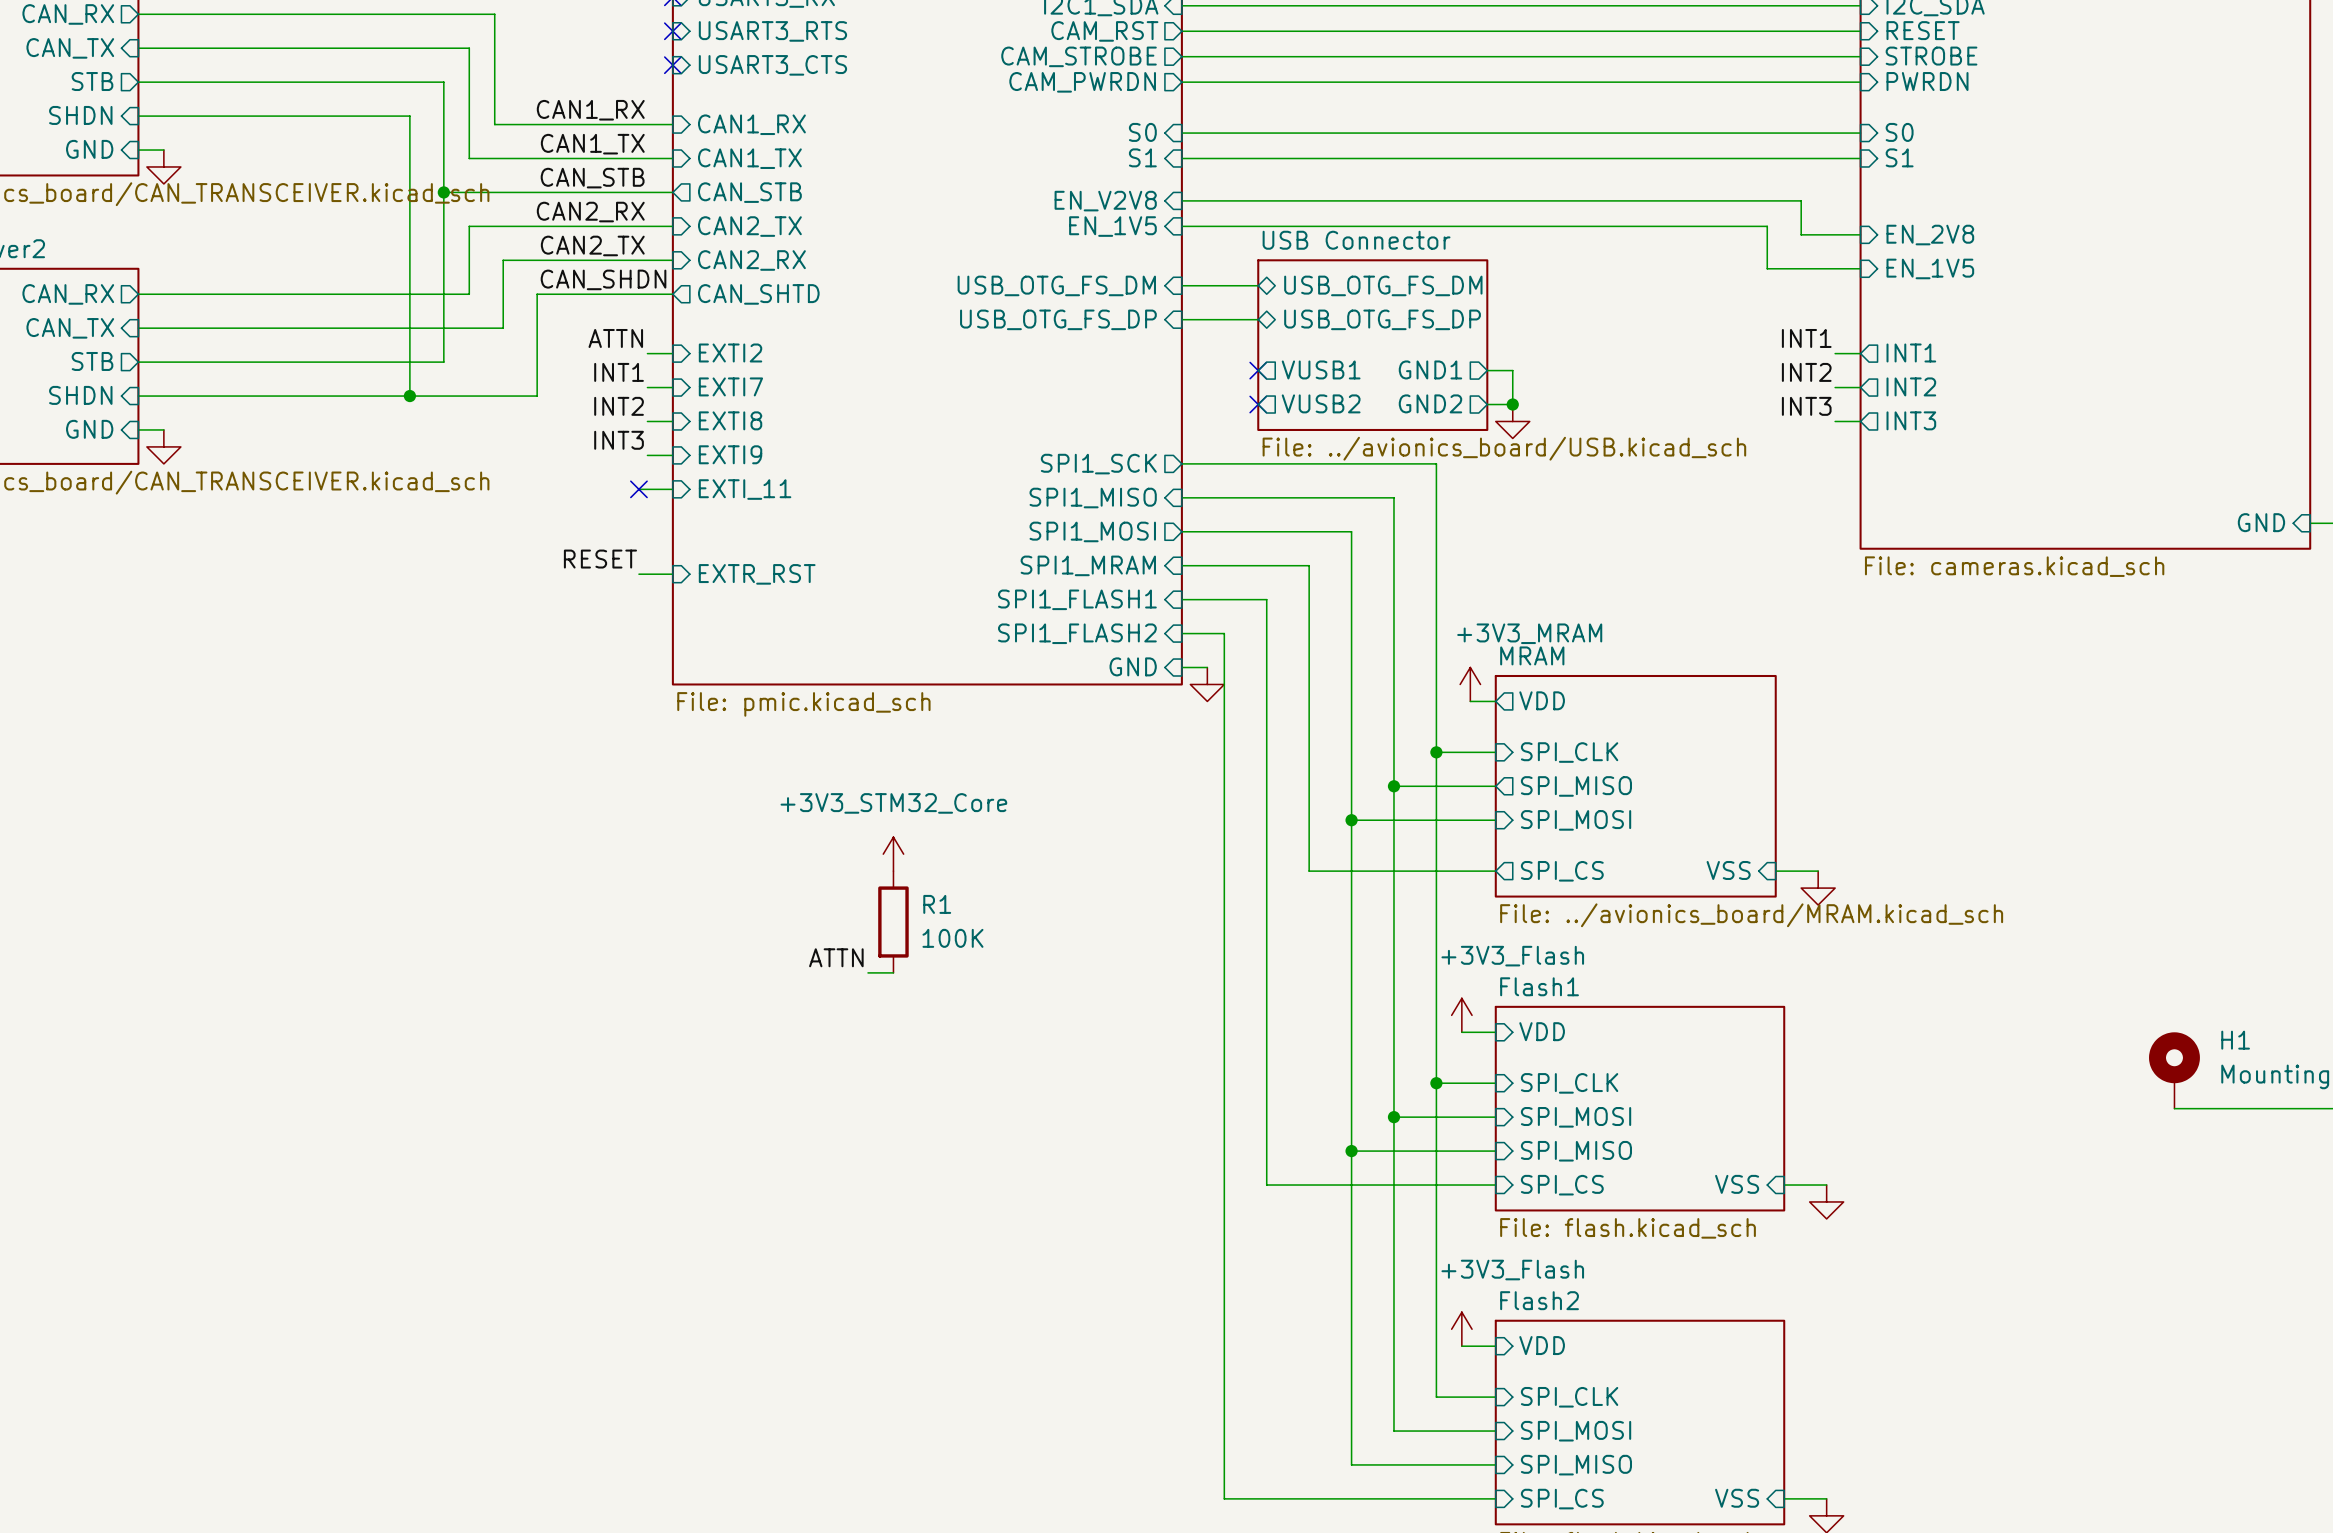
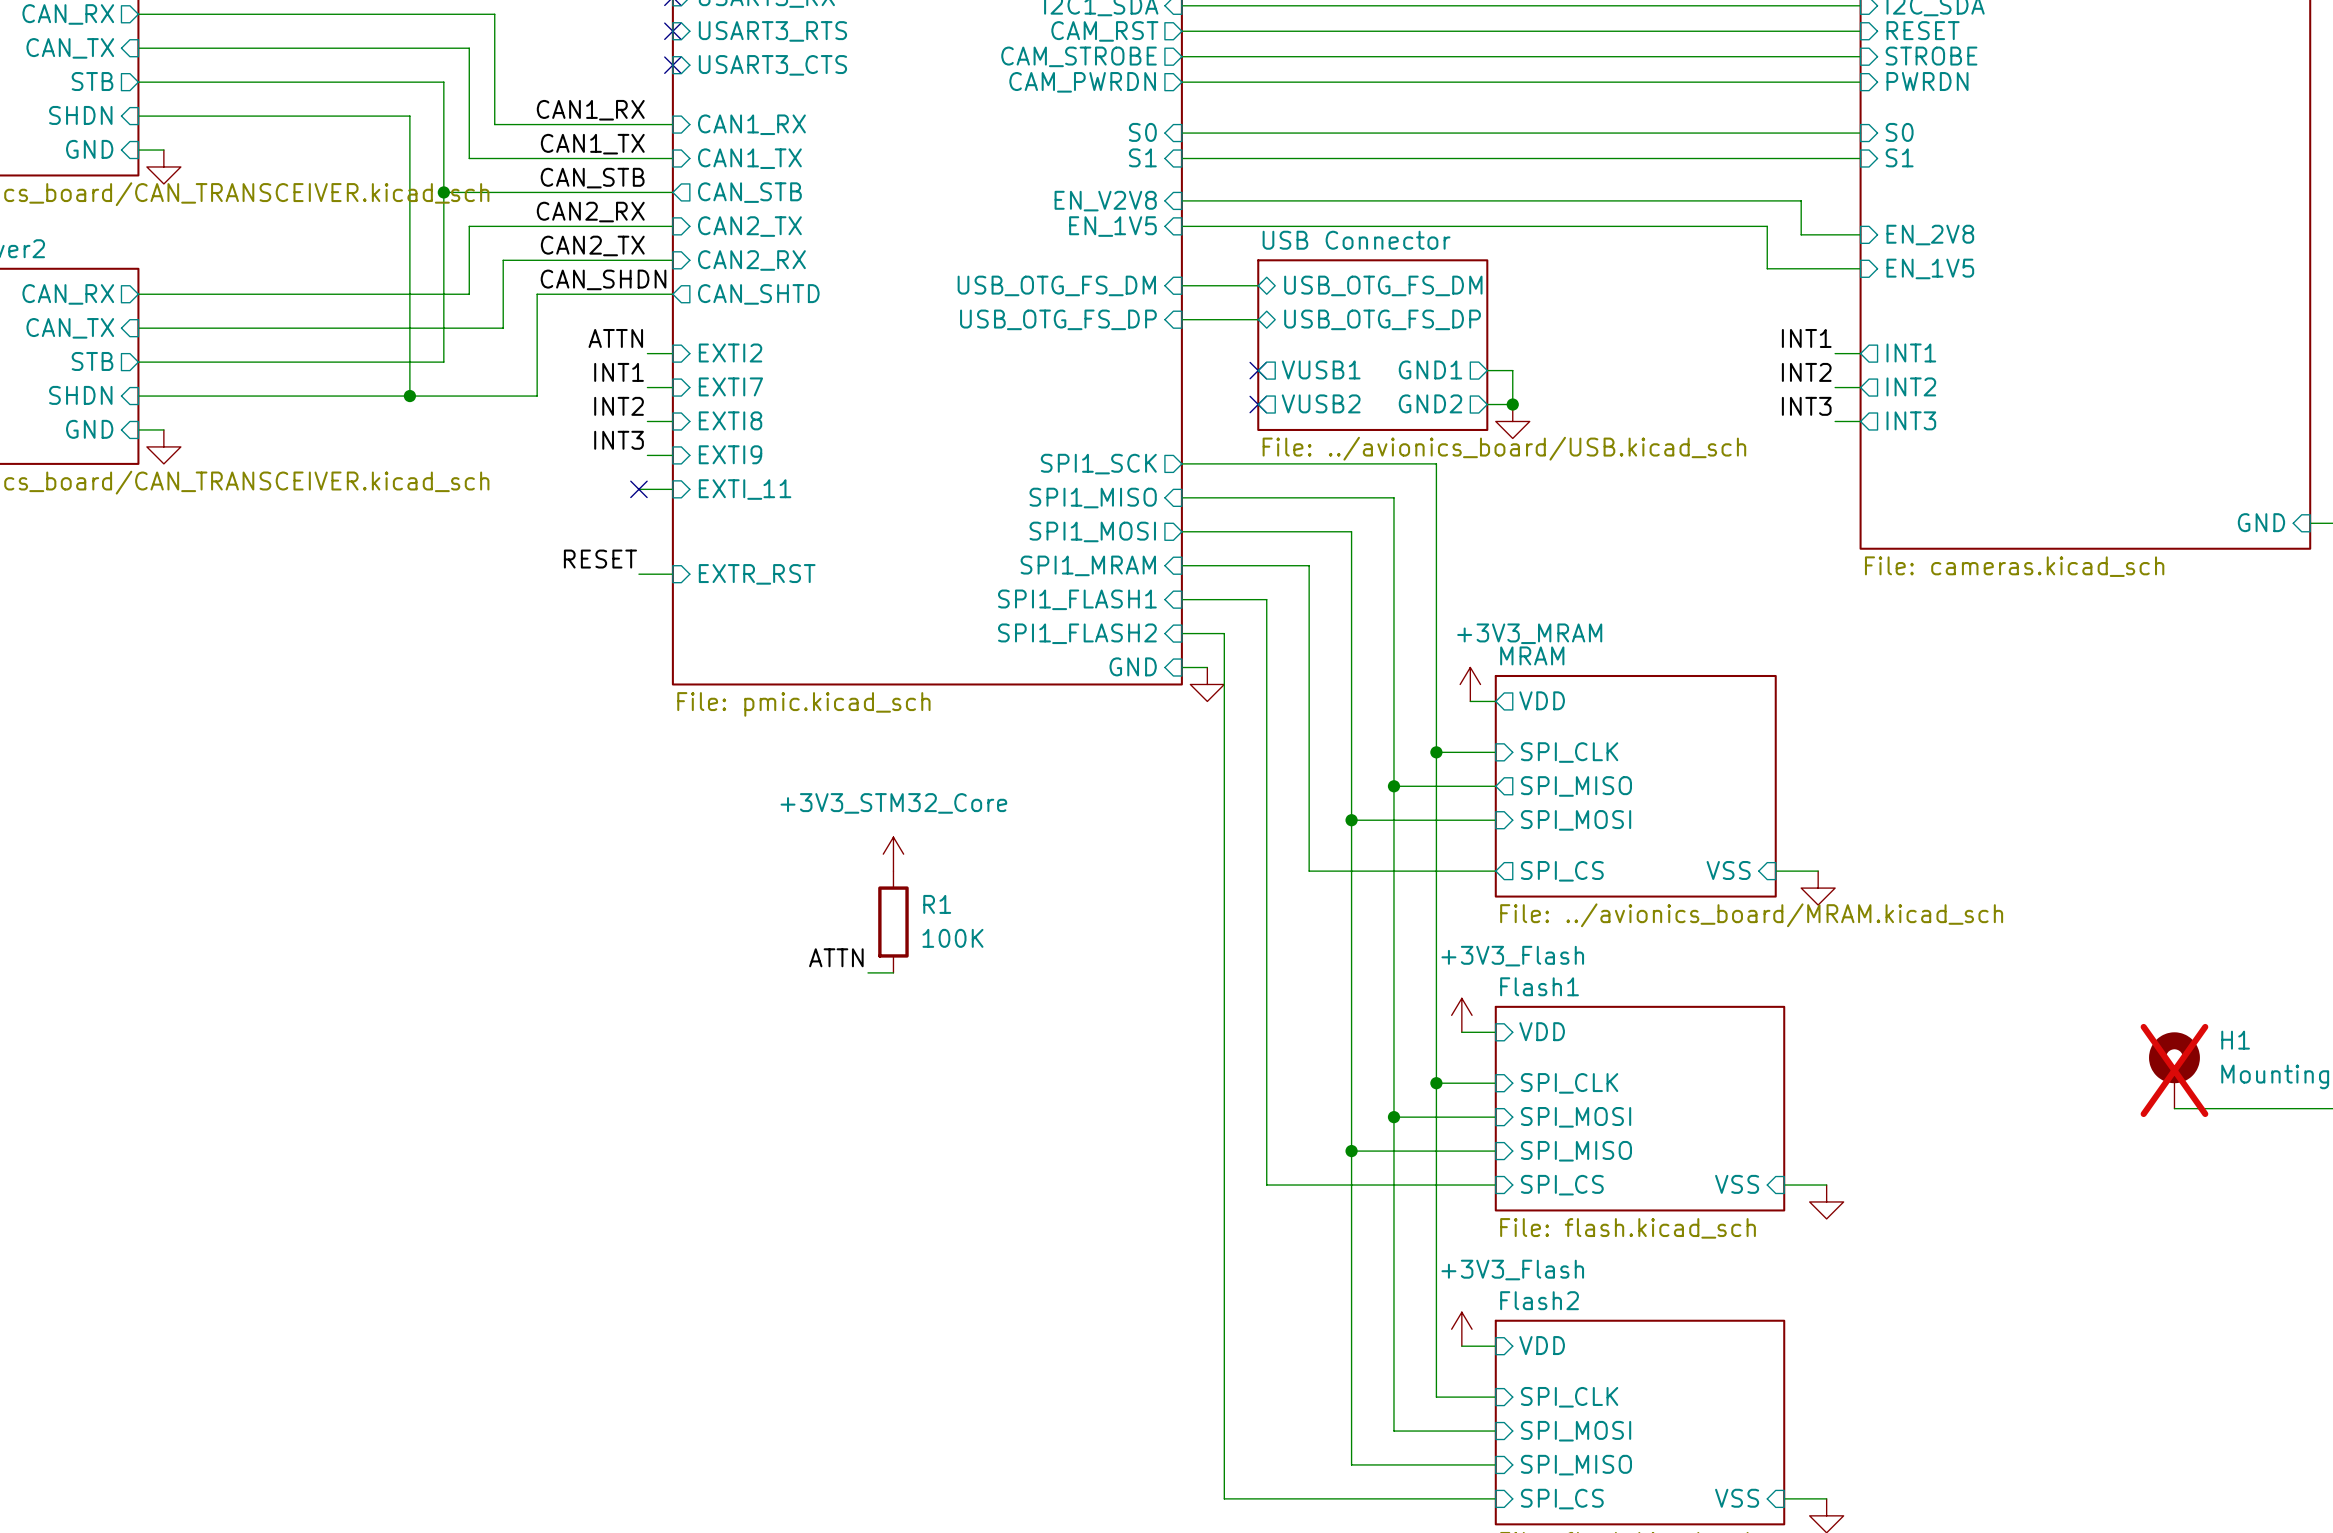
H1 do-not-place cross: none -> (2174, 1070)

